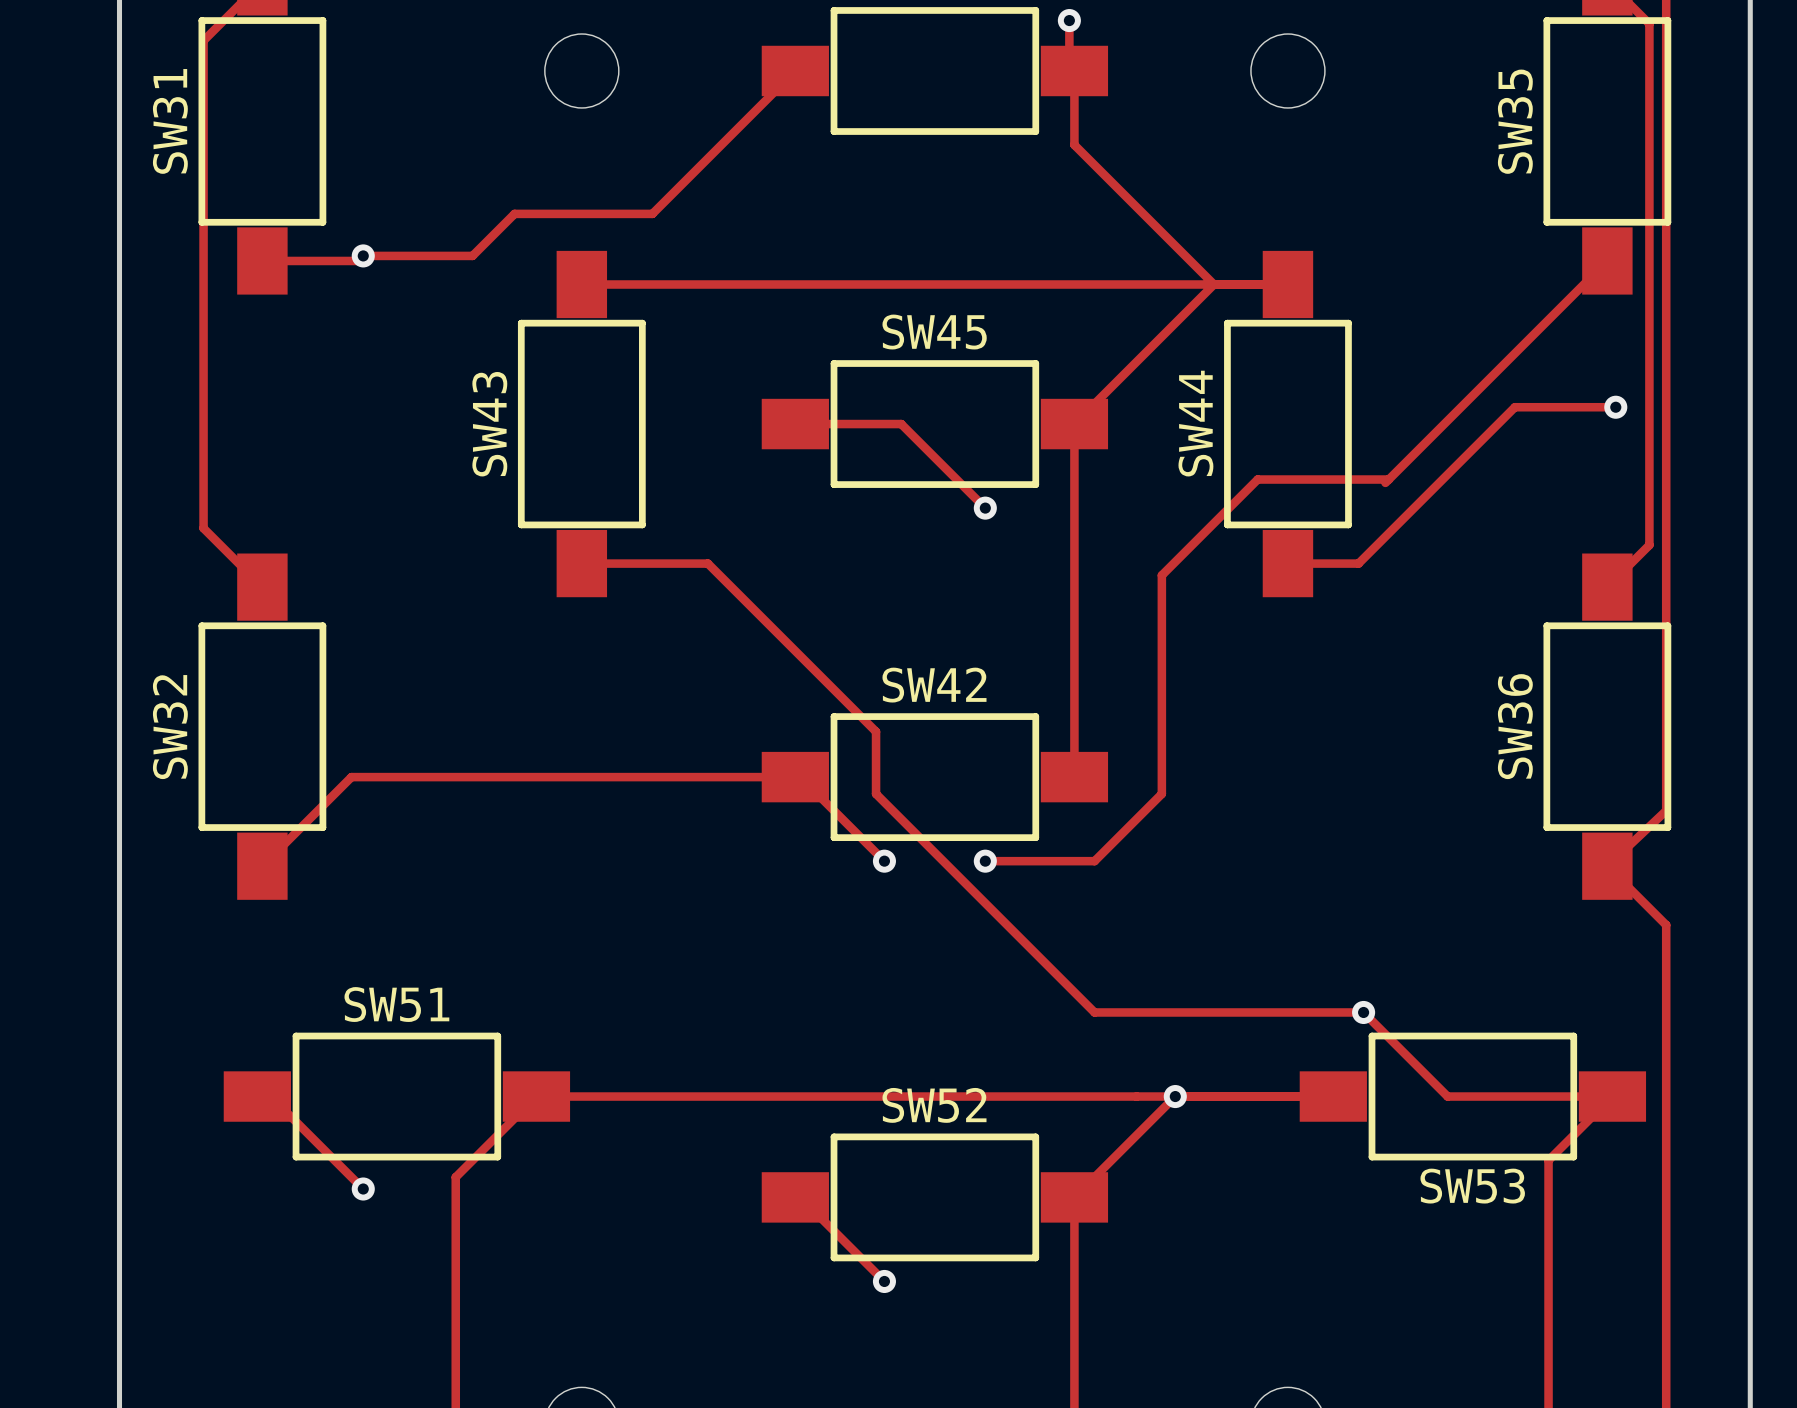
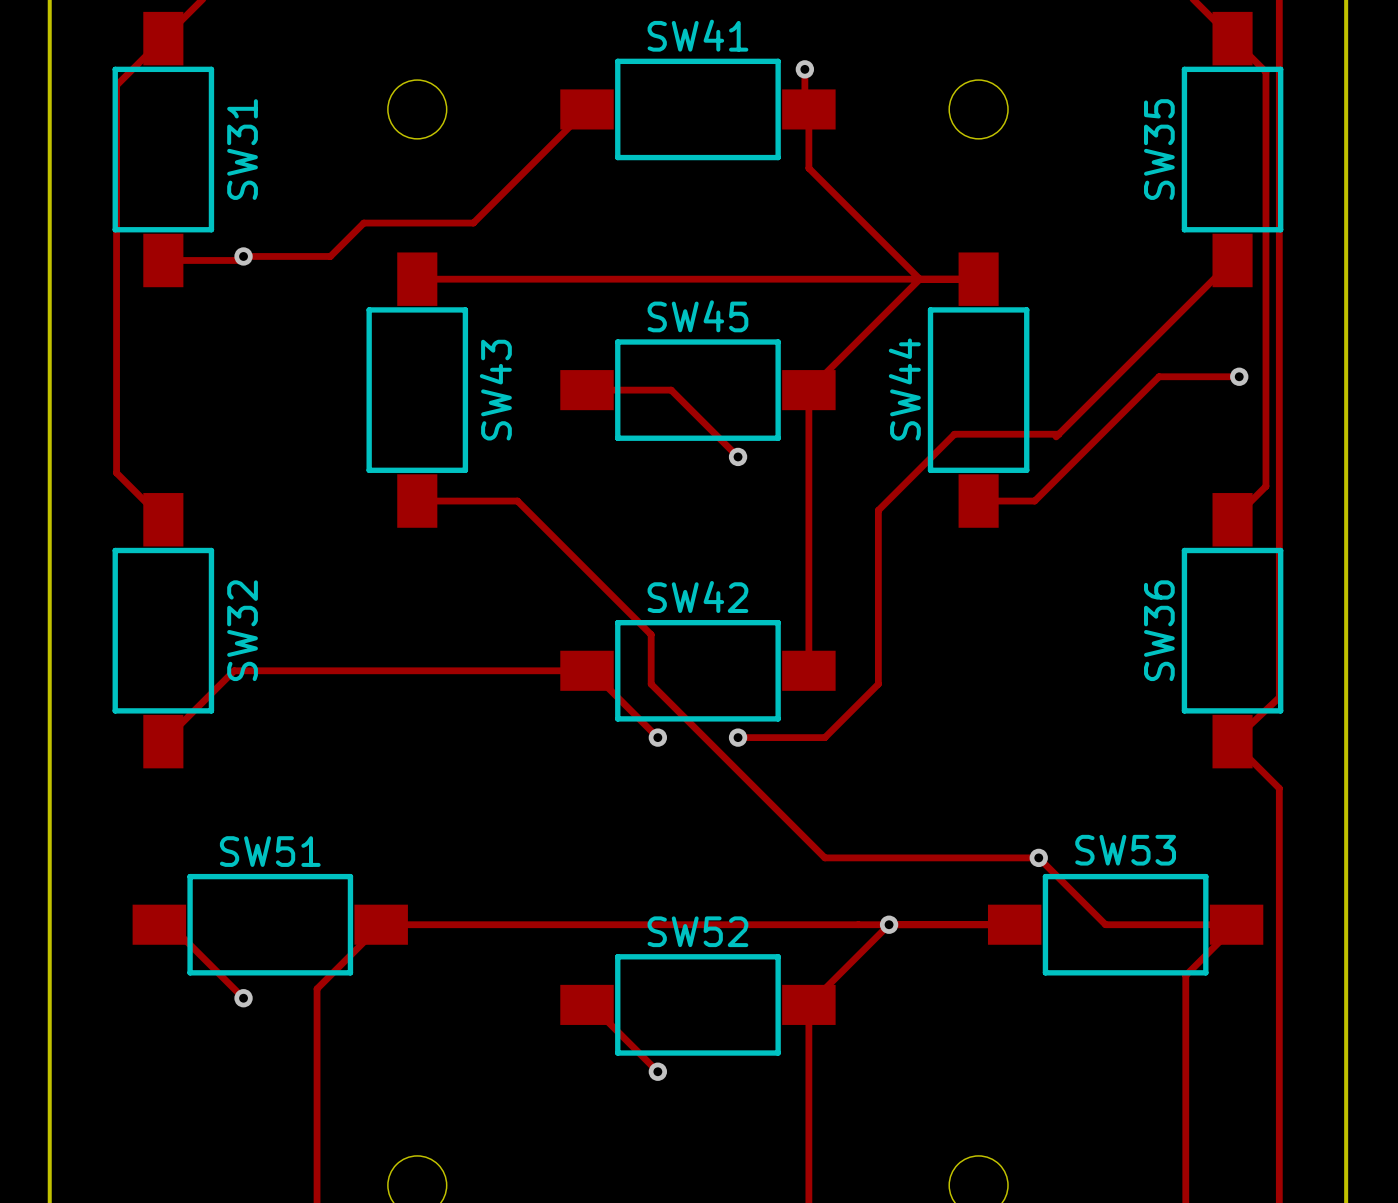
SW31 name position: SW31 (170, 121) -> SW31 (242, 149)
SW43 name position: SW43 (489, 424) -> SW43 (495, 390)
SW32 name position: SW32 (170, 727) -> SW32 (242, 630)
SW53 name position: SW53 (1472, 1186) -> SW53 (1125, 850)

